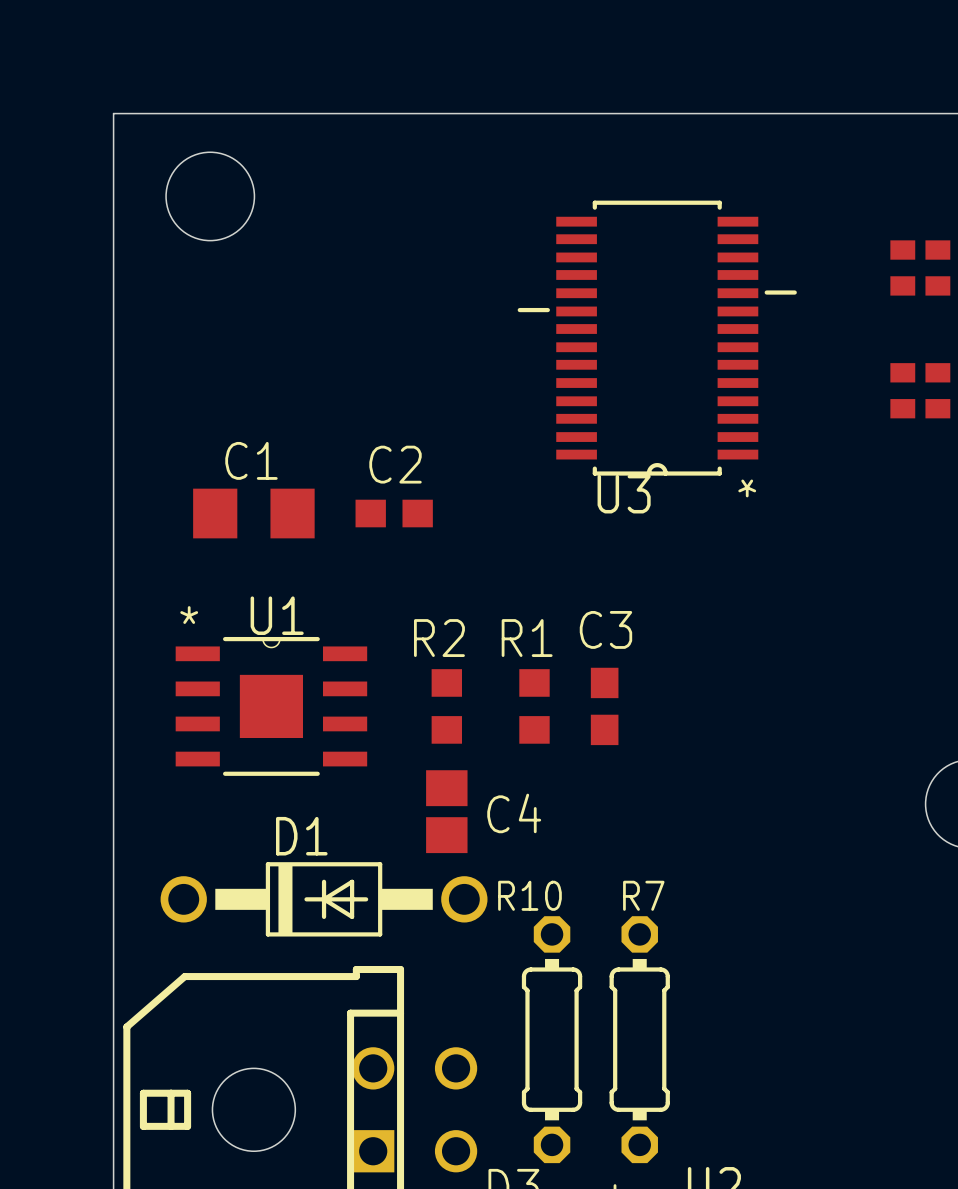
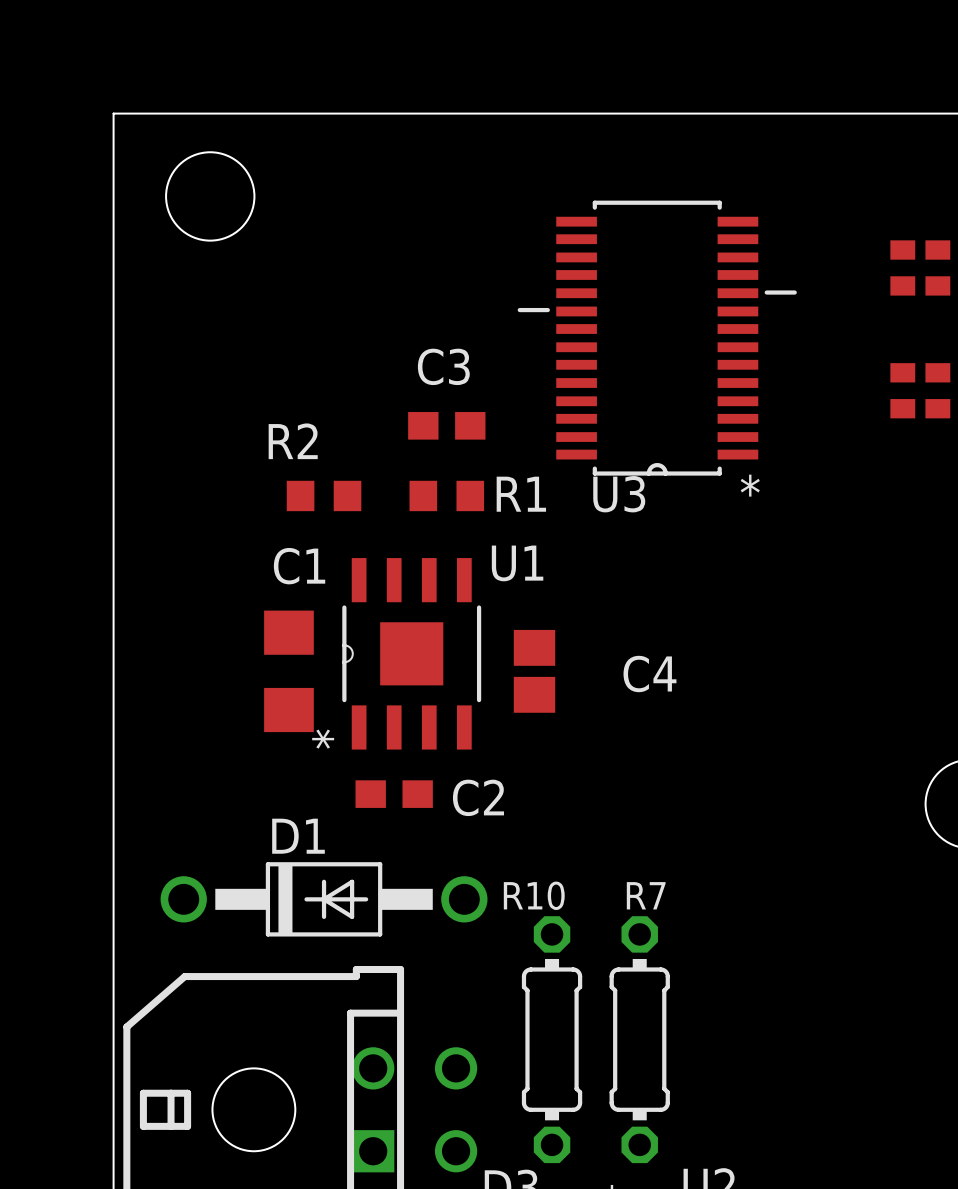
C1 name position: C1 (251, 460) -> C1 (299, 566)
C2 name position: C2 (395, 464) -> C2 (478, 797)
C1 rotation: 0° (253, 513) -> 90° clockwise (288, 671)
C1 position: (253, 513) -> (288, 671)
C2 position: (394, 513) -> (394, 794)
U1 name position: U1 (277, 615) -> U1 (517, 563)
U1 rotation: 0° (271, 706) -> 90° counterclockwise (411, 653)
U1 position: (271, 706) -> (411, 653)
R2 rotation: 0° (446, 706) -> 90° clockwise (324, 495)
R2 position: (446, 706) -> (324, 495)
R1 rotation: 0° (534, 706) -> 90° clockwise (446, 495)
R1 position: (534, 706) -> (446, 495)
C3 rotation: 0° (604, 706) -> 90° clockwise (446, 425)
C3 position: (604, 706) -> (446, 425)
C4 position: (446, 811) -> (534, 671)
C4 name position: C4 (514, 813) -> C4 (649, 674)

